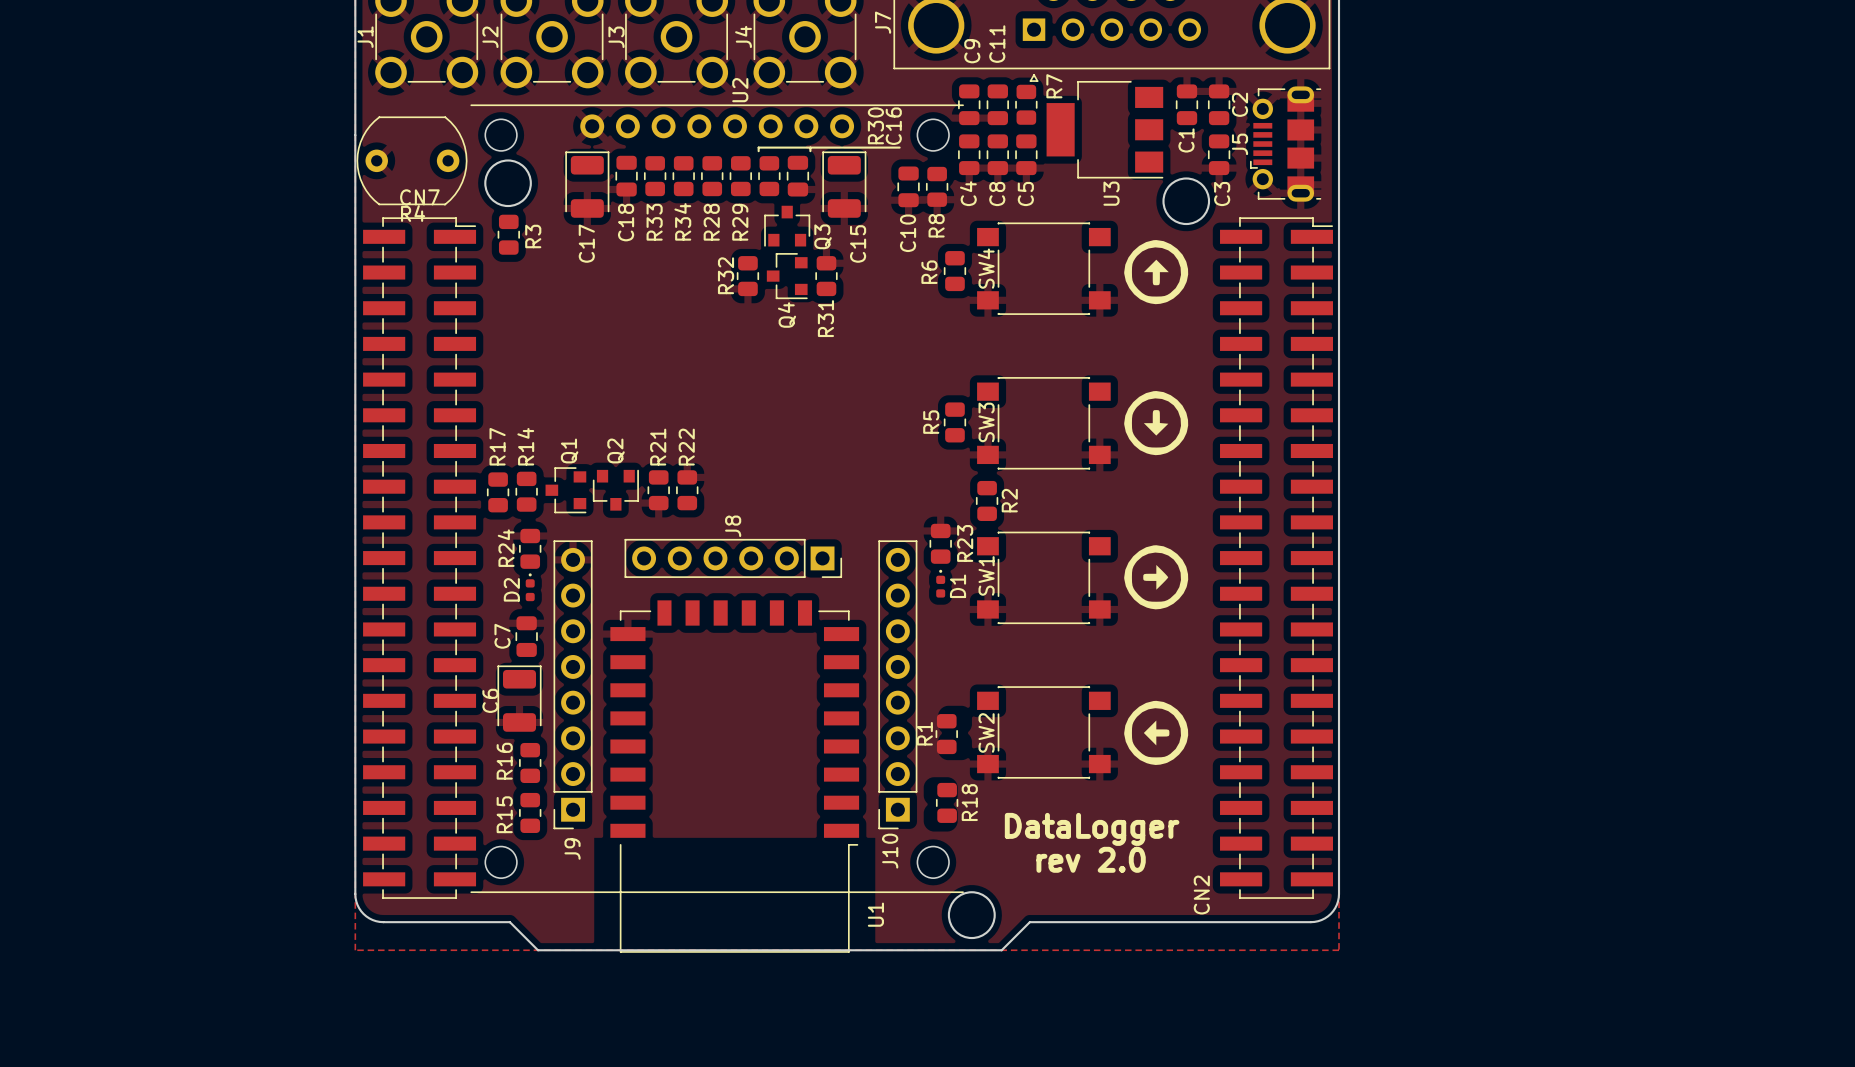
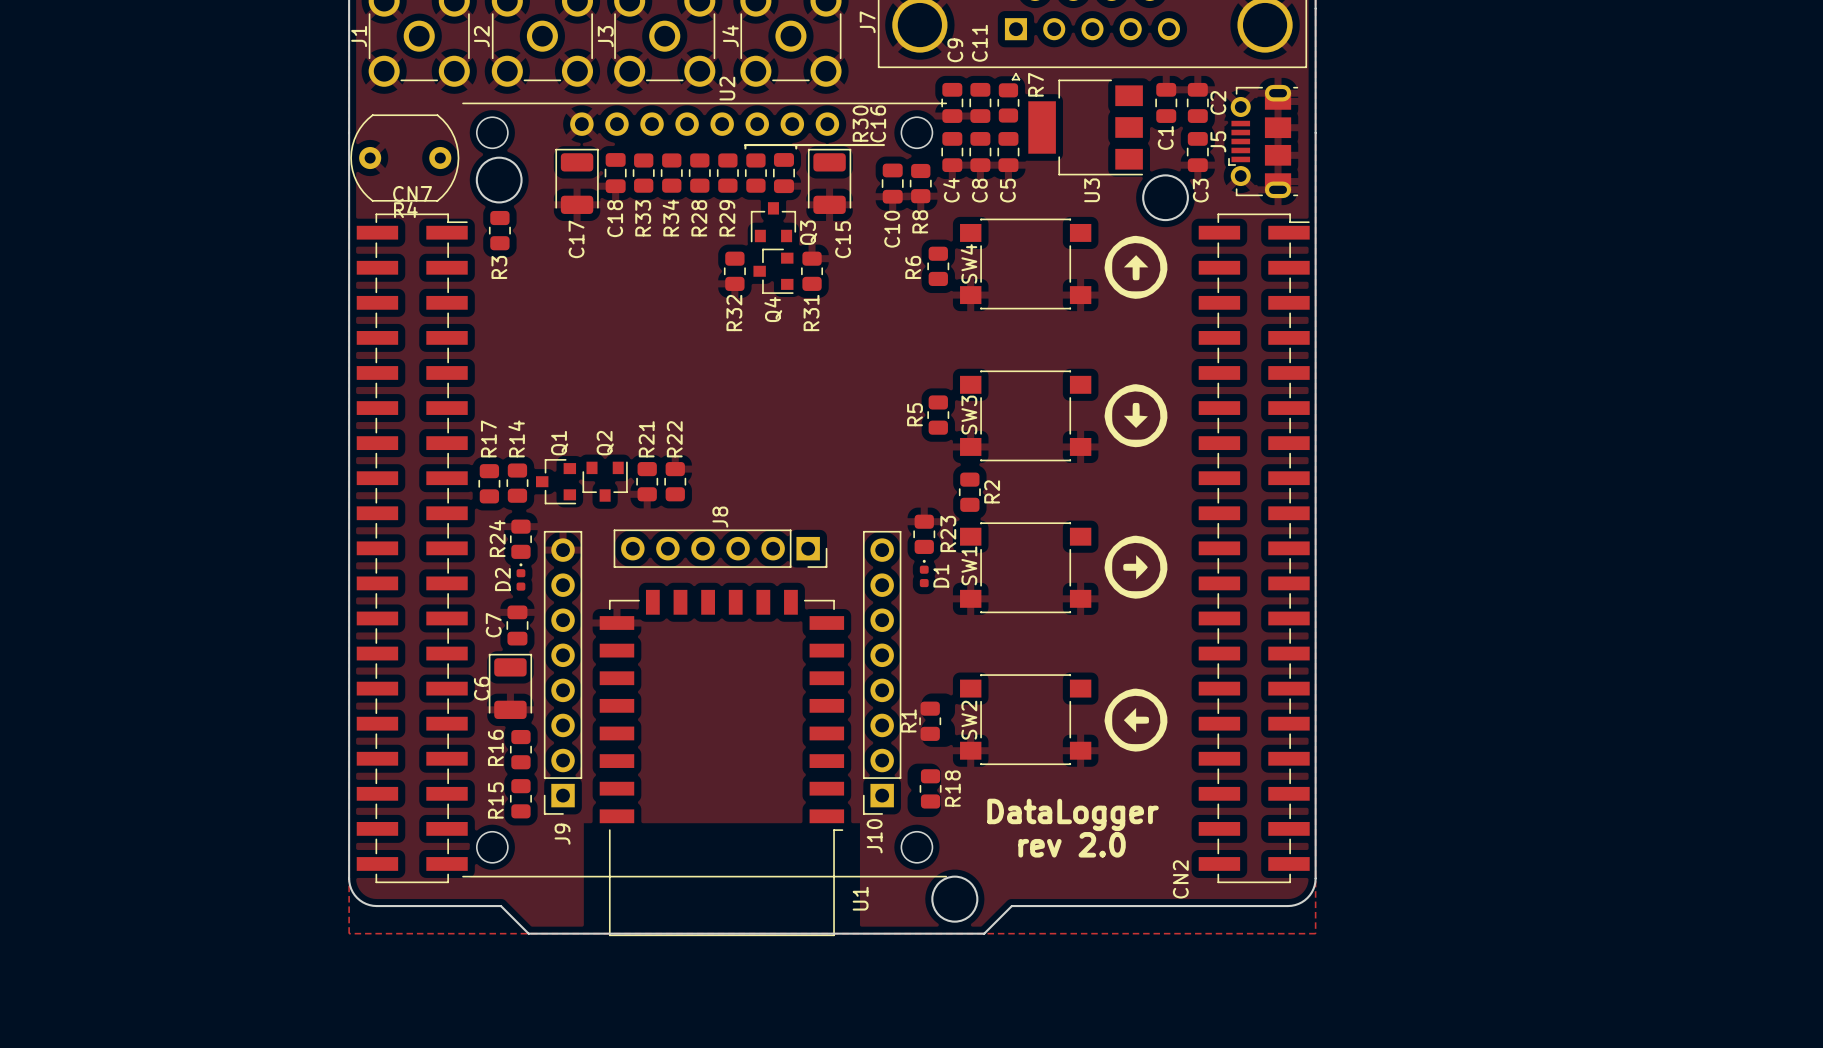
R3 name position: R3 (533, 236) -> R3 (499, 267)
R32 name position: R32 (726, 275) -> R32 (734, 313)

